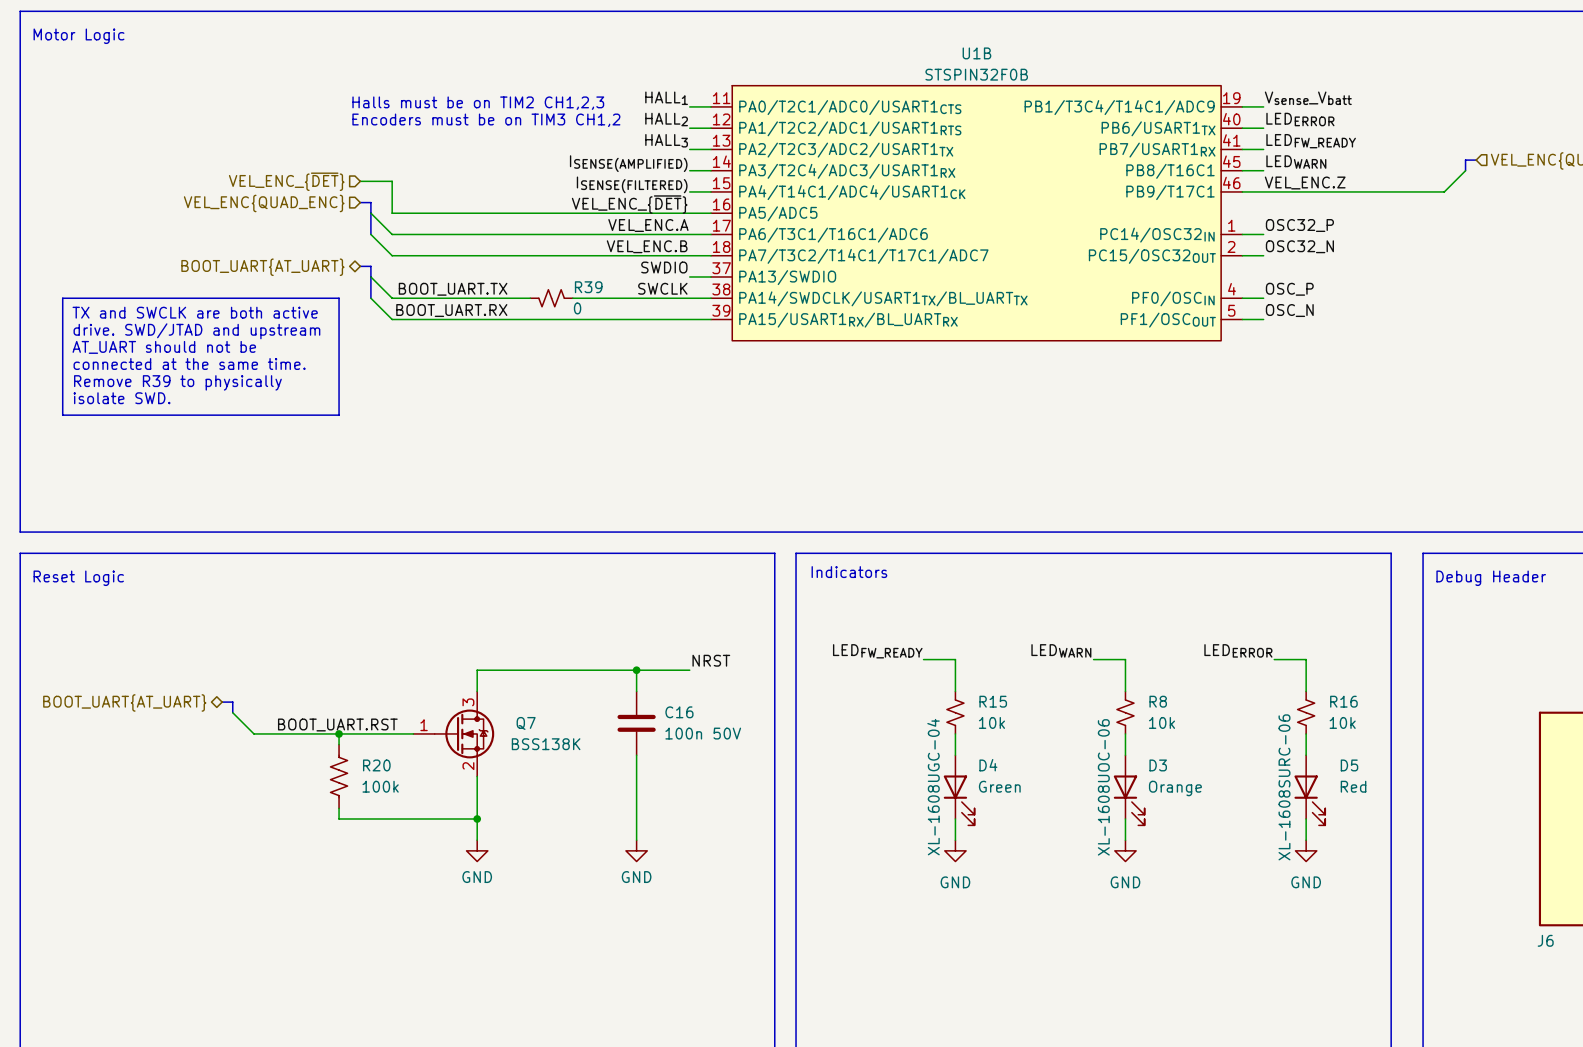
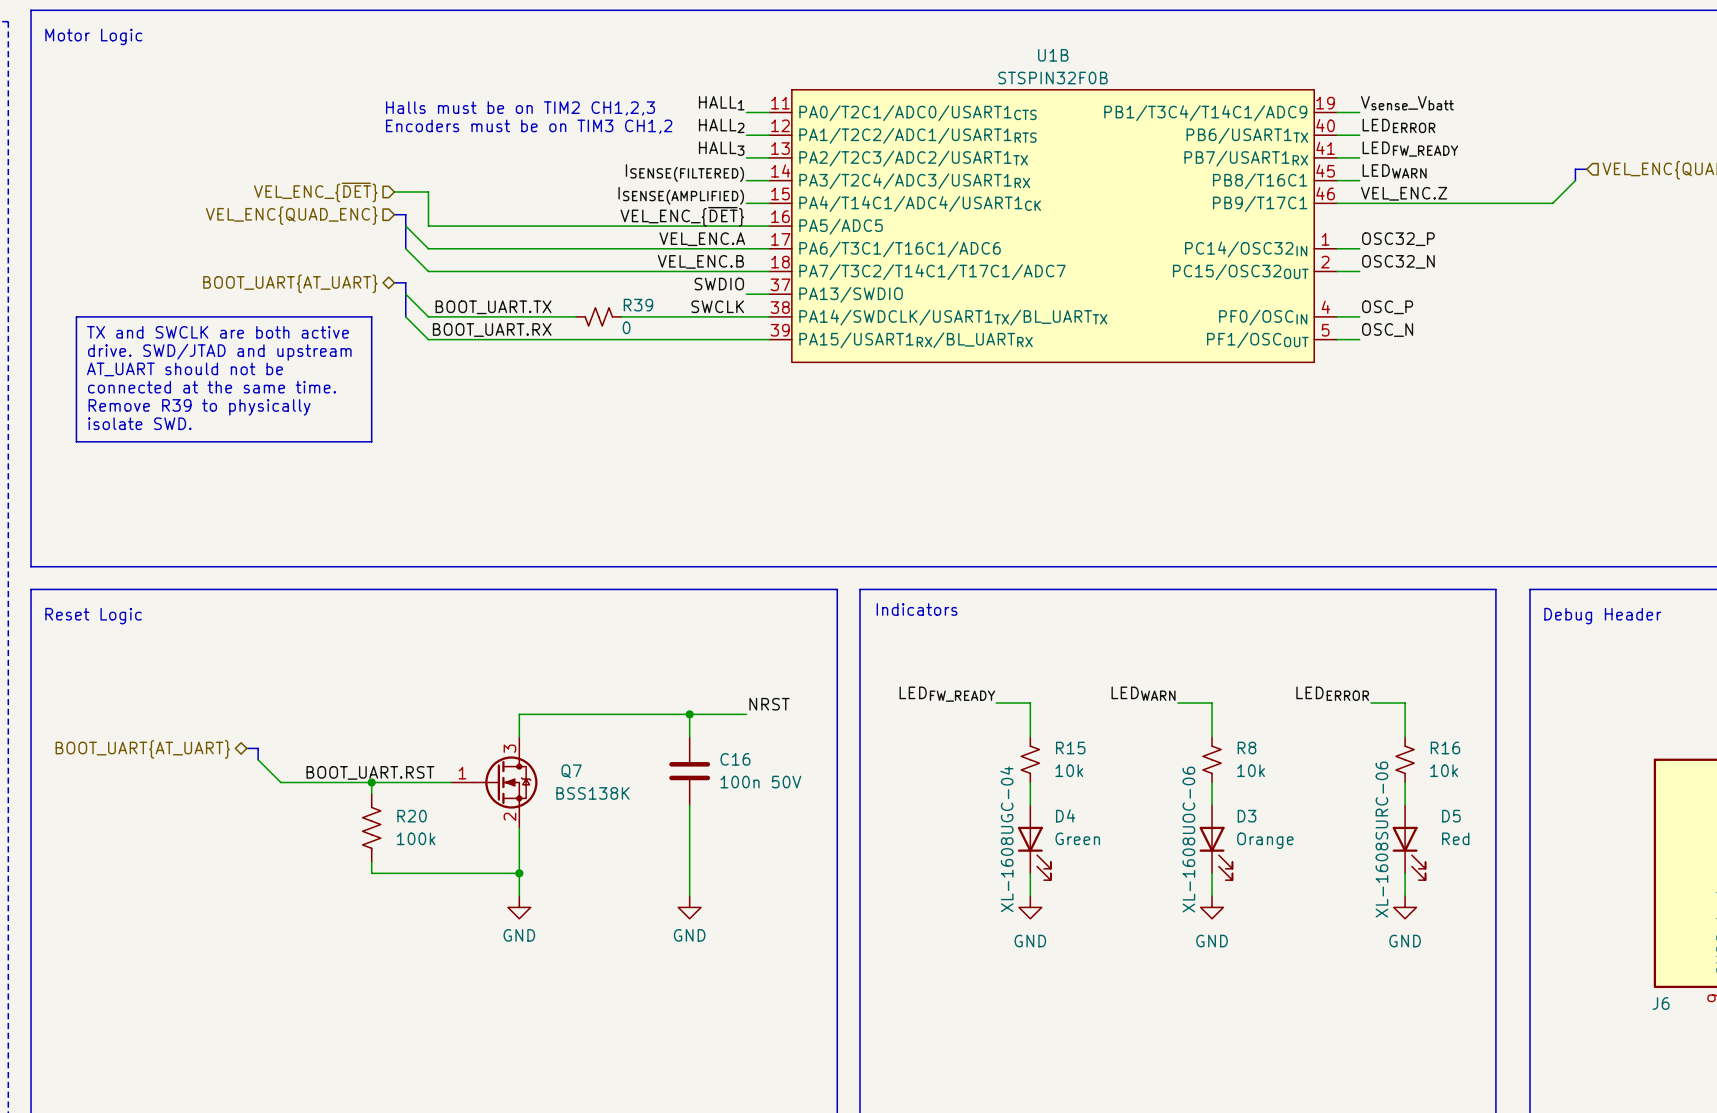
label: ISENSE(AMPLIFIED) (628, 163) -> ISENSE(FILTERED) (684, 173)
label: ISENSE(FILTERED) (632, 184) -> ISENSE(AMPLIFIED) (681, 195)

